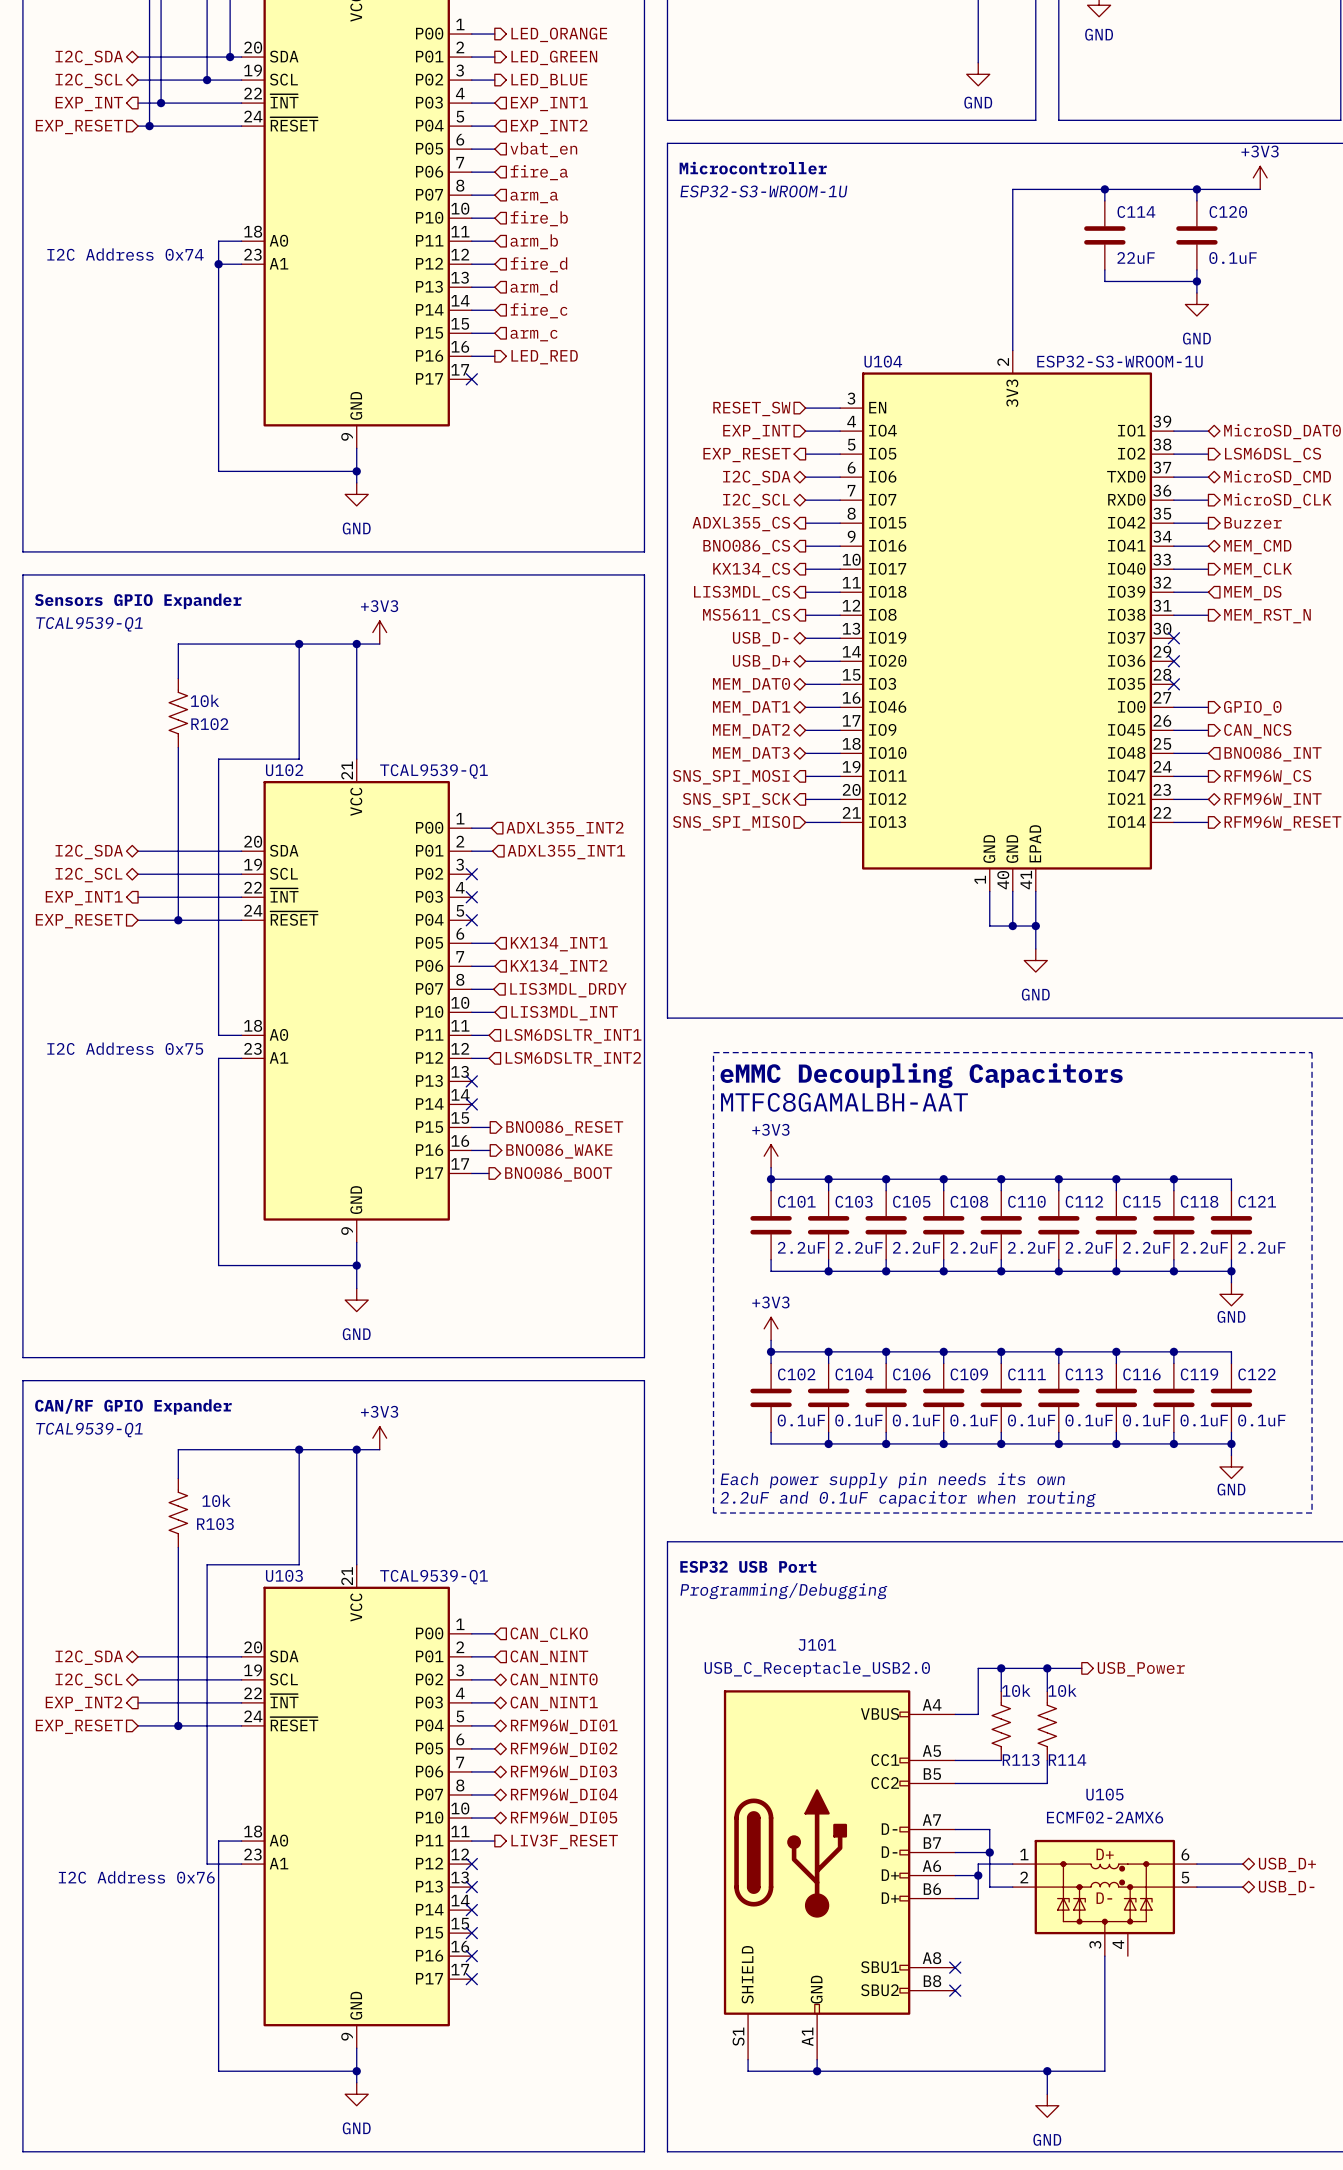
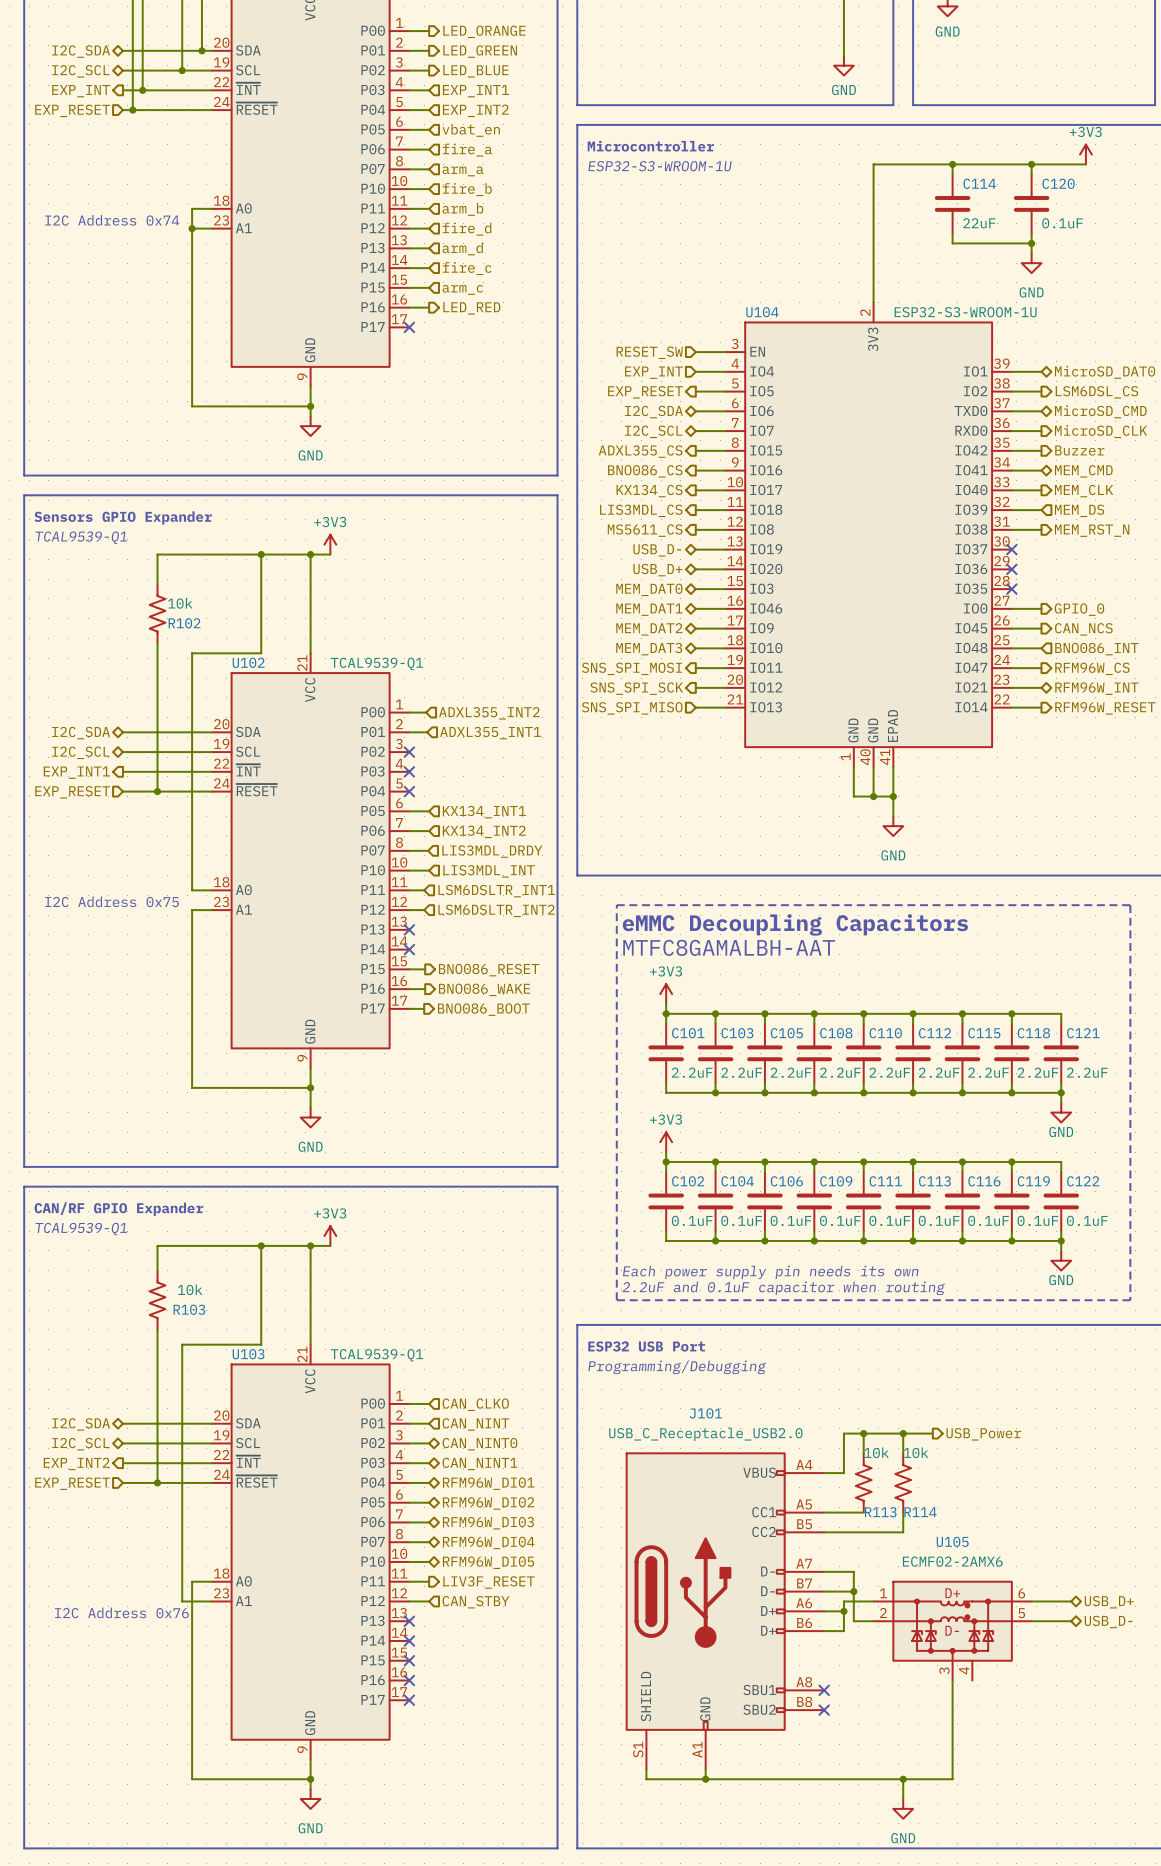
wire: none -> (409, 1601) (429, 1601)
no-connect mark: (471, 1864) -> none
hierarchical label: none -> CAN_STBY (476, 1602)

